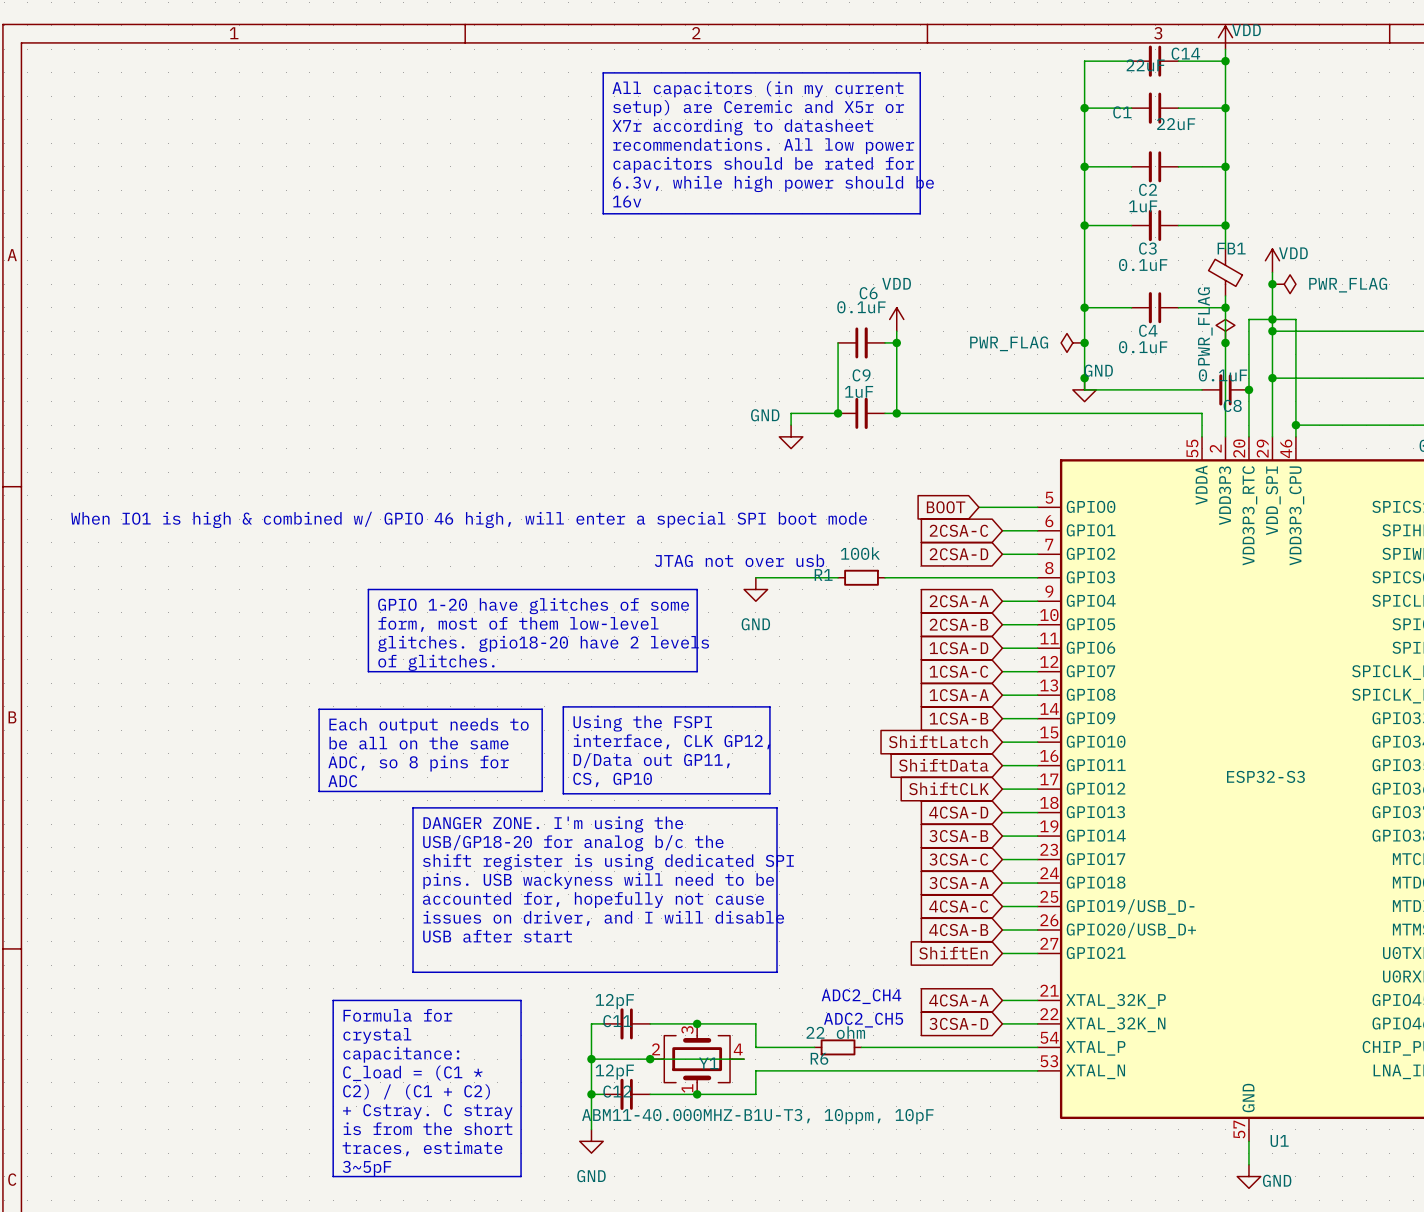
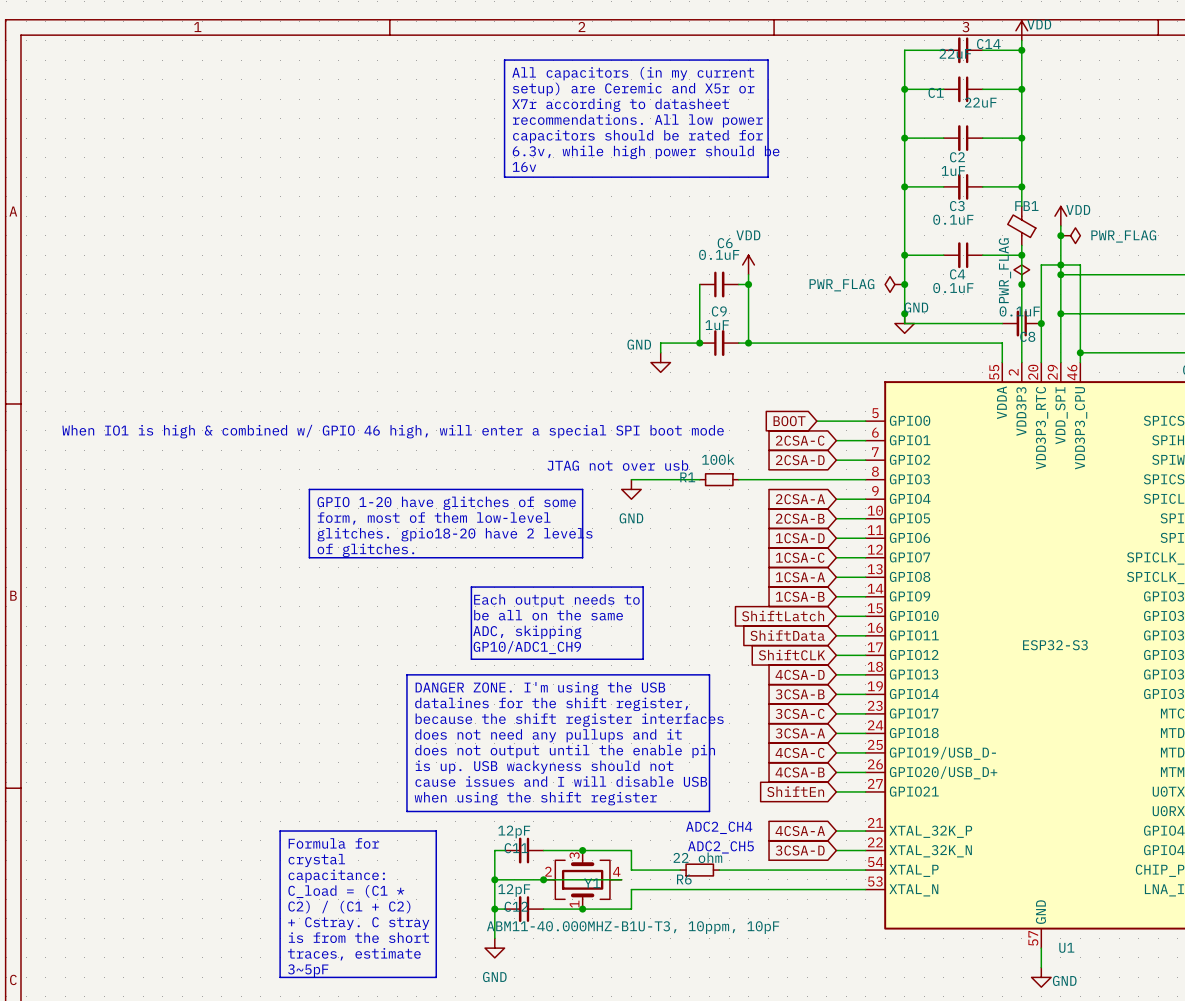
line: (319, 709) (542, 709) (542, 791) (319, 791) (319, 709) -> none
text: Using the FSPI (642, 723) -> Each output needs to (556, 600)
text: Each output needs to (429, 725) -> none
text: interface, CLK GP12, (672, 741) -> be all on the same (548, 615)
text: be all on the same (418, 743) -> none
text: D/Data out GP11, (651, 760) -> ADC, skipping (527, 632)
text: ADC, so 8 pins for (418, 763) -> none
text: CS, GP10 (612, 779) -> GP10/ADC1_CH9 (527, 647)
text: ADC (342, 781) -> none
line: (413, 807) (776, 807) (776, 972) (413, 972) (413, 807) -> (406, 674) (709, 674) (709, 811) (406, 811) (406, 674)
text: DANGER ZONE. I'm using the (553, 824) -> DANGER ZONE. I'm using the USB (540, 688)
text: USB/GP18-20 for analog b/c the (573, 843) -> none
text: none -> datalines for the shift register, (551, 704)
text: shift register is using dedicated SPI (608, 862) -> none
text: none -> because the shift register interfaces (569, 720)
text: pins. USB wackyness will need to be (598, 881) -> none
text: none -> does not need any pullups and it (548, 735)
text: accounted for, hopefully not cause (593, 900) -> none
text: none -> does not output until the enable pin (565, 751)
text: issues on driver, and I will disable (603, 918) -> cause issues and I will disable USB (561, 781)
text: none -> is up. USB wackyness should not (544, 767)
text: USB after start (497, 936) -> none
text: none -> when using the shift register (535, 798)

